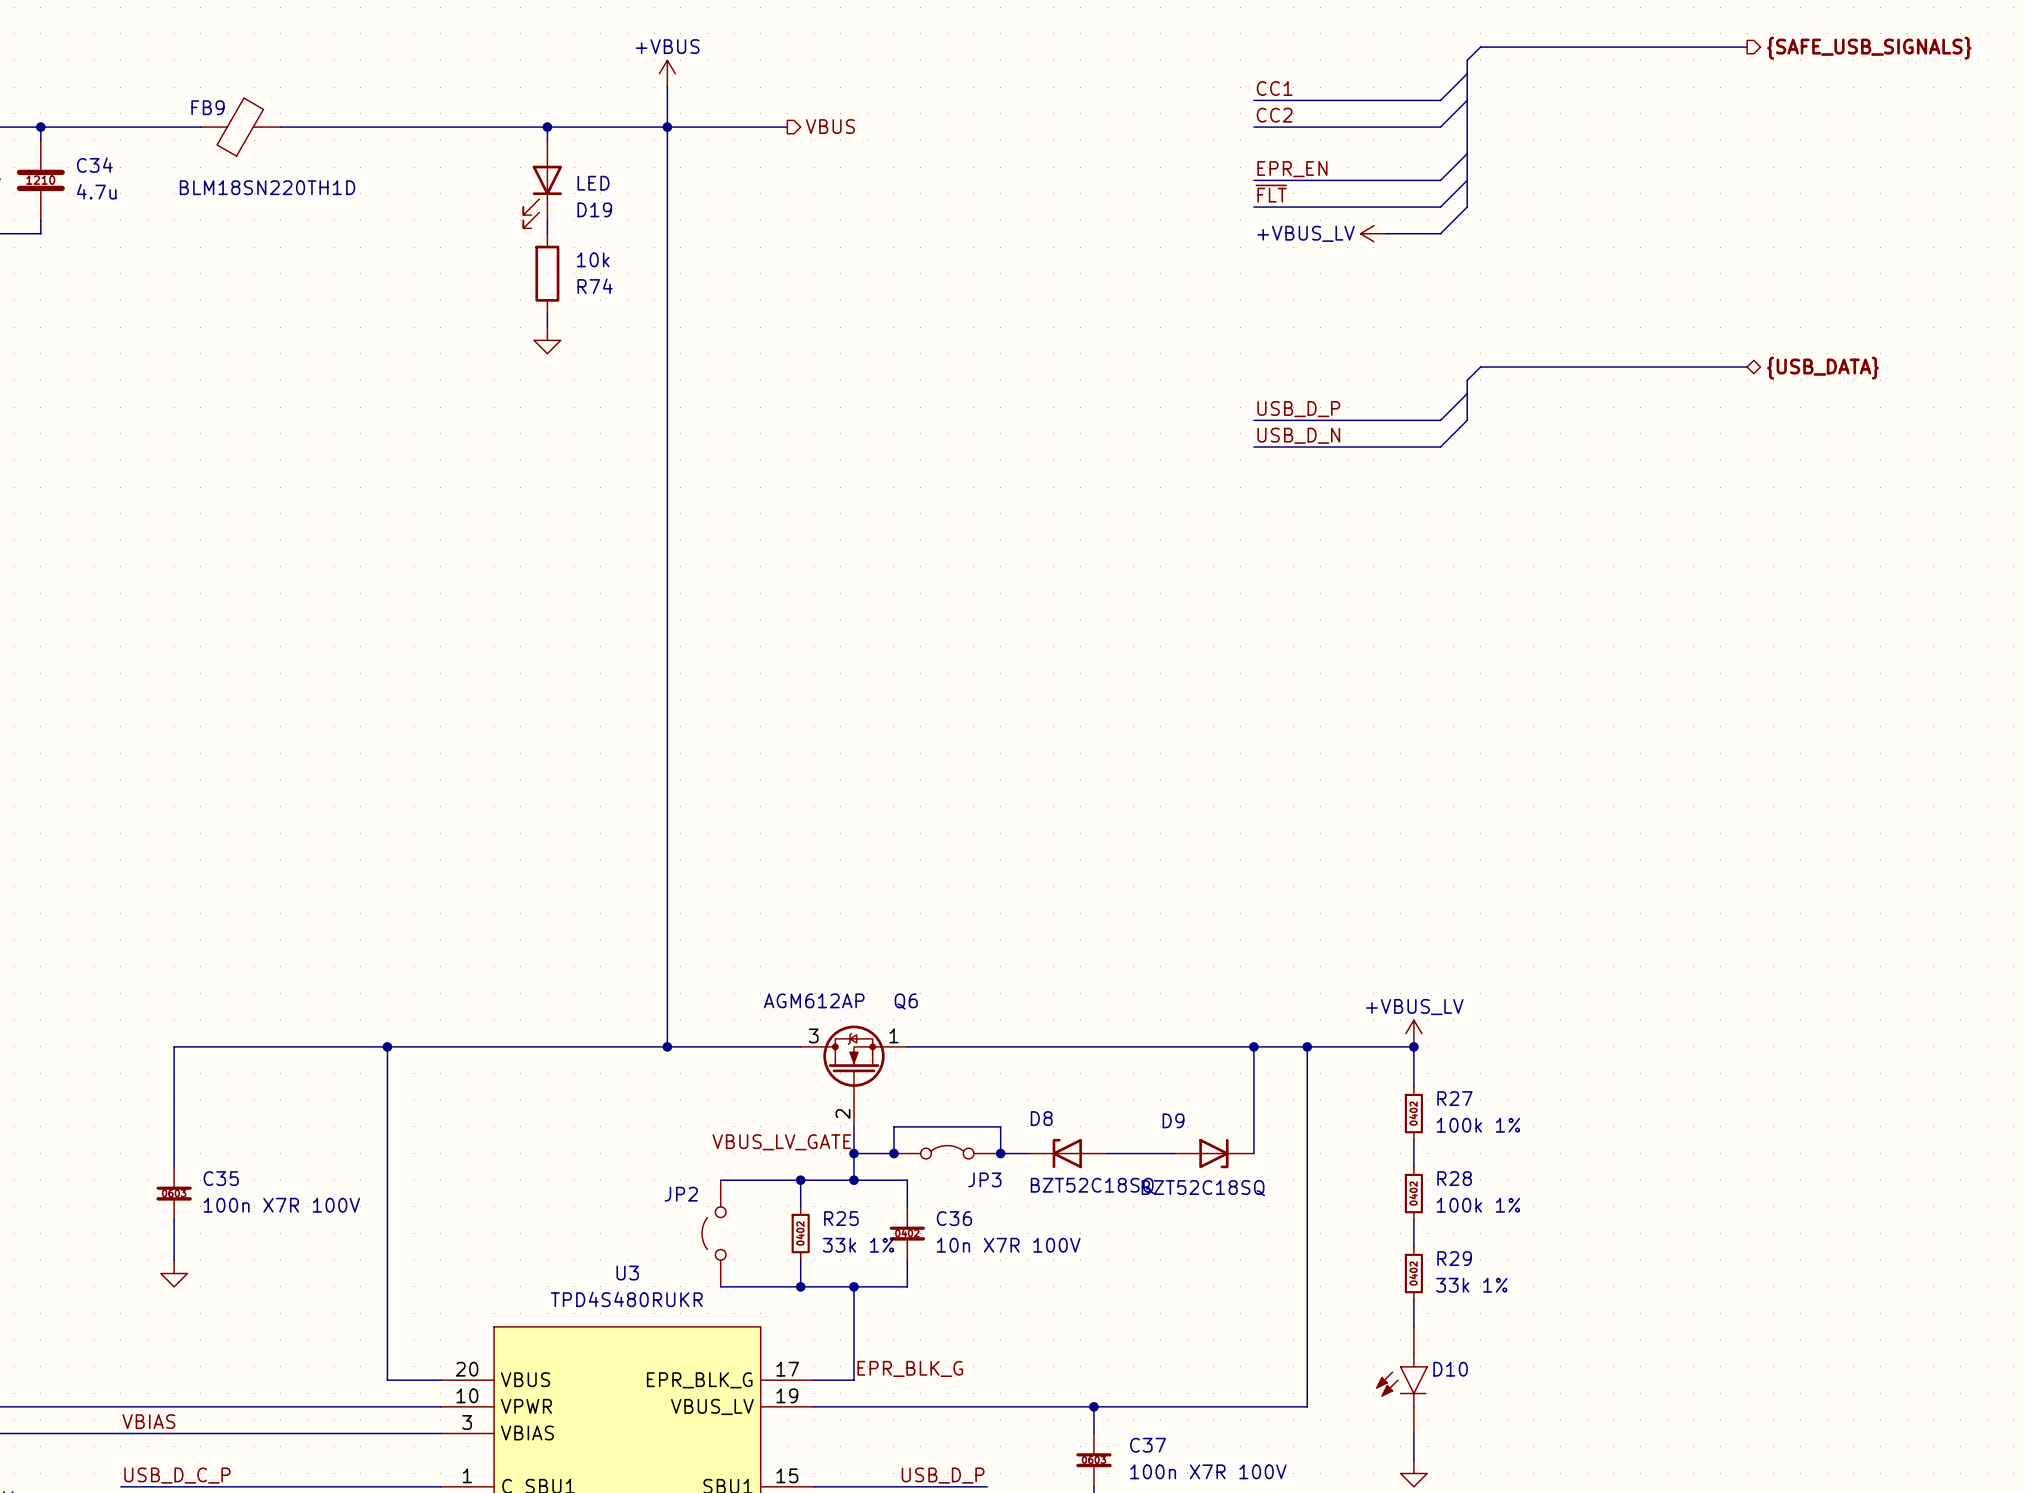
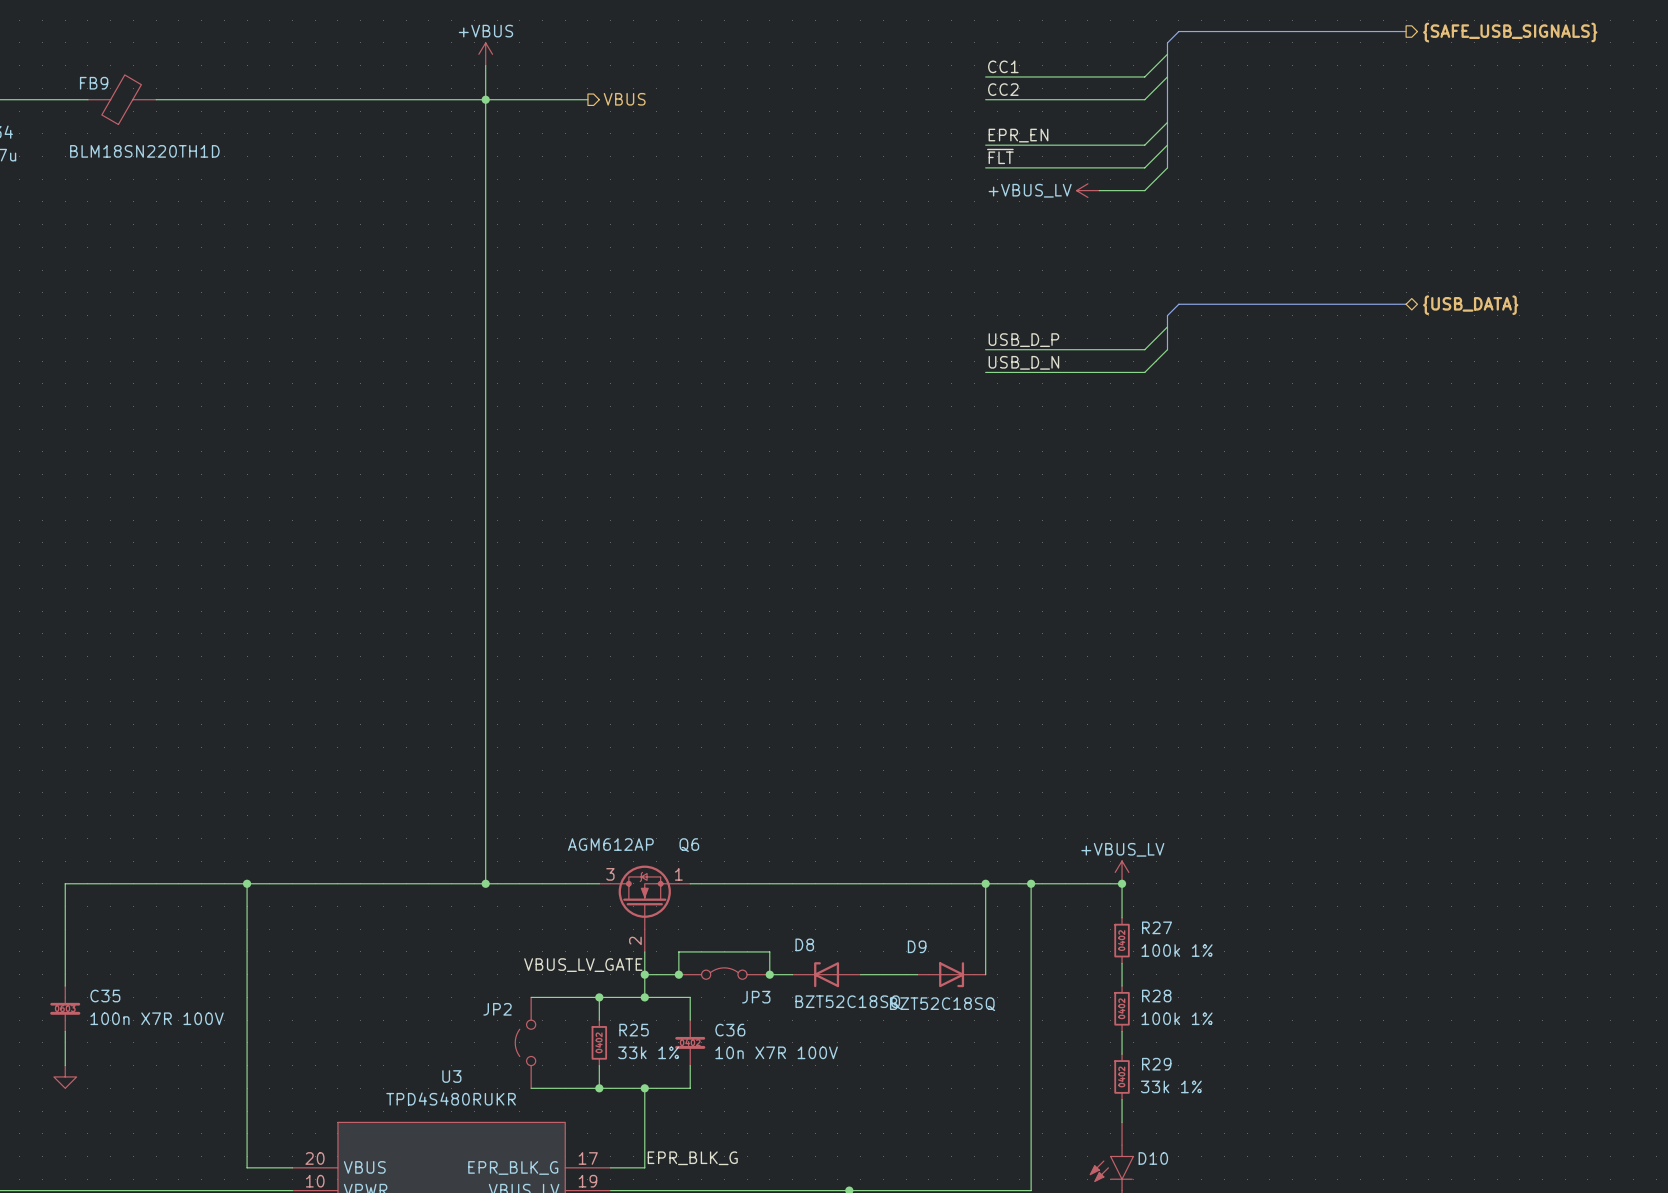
wire: (547, 127) (547, 140) -> none
junction: (547, 127) -> none
D19: LED (542, 184) -> none
wire: (547, 220) (547, 233) -> none
R74: 10k (547, 273) -> none
wire: (547, 313) (547, 327) -> none
power symbol: (547, 340) -> none

